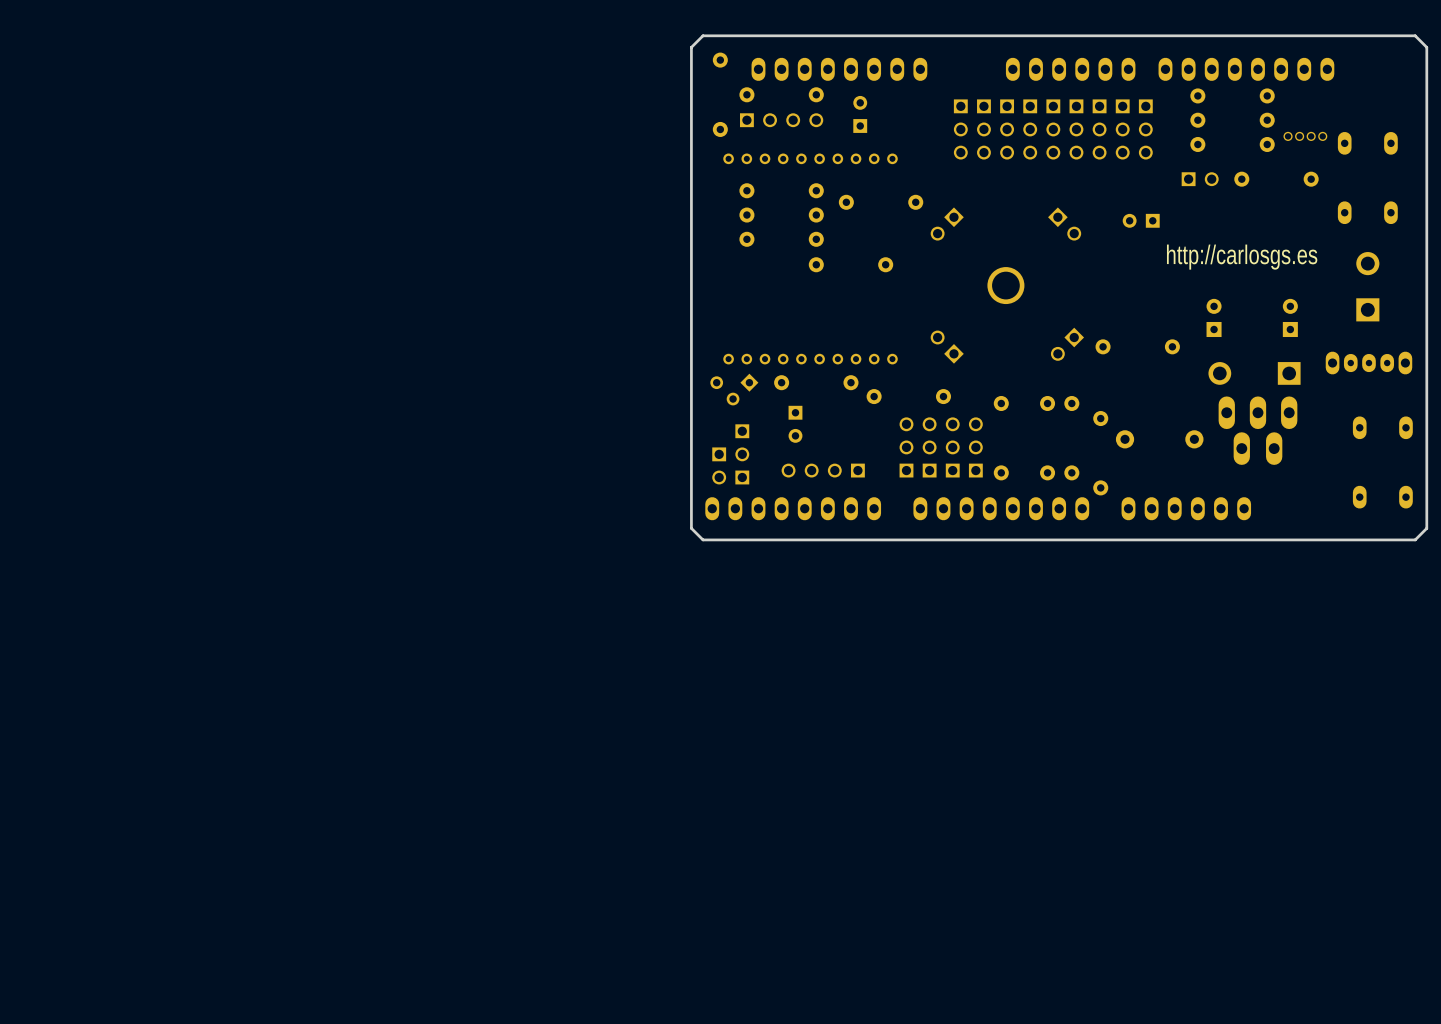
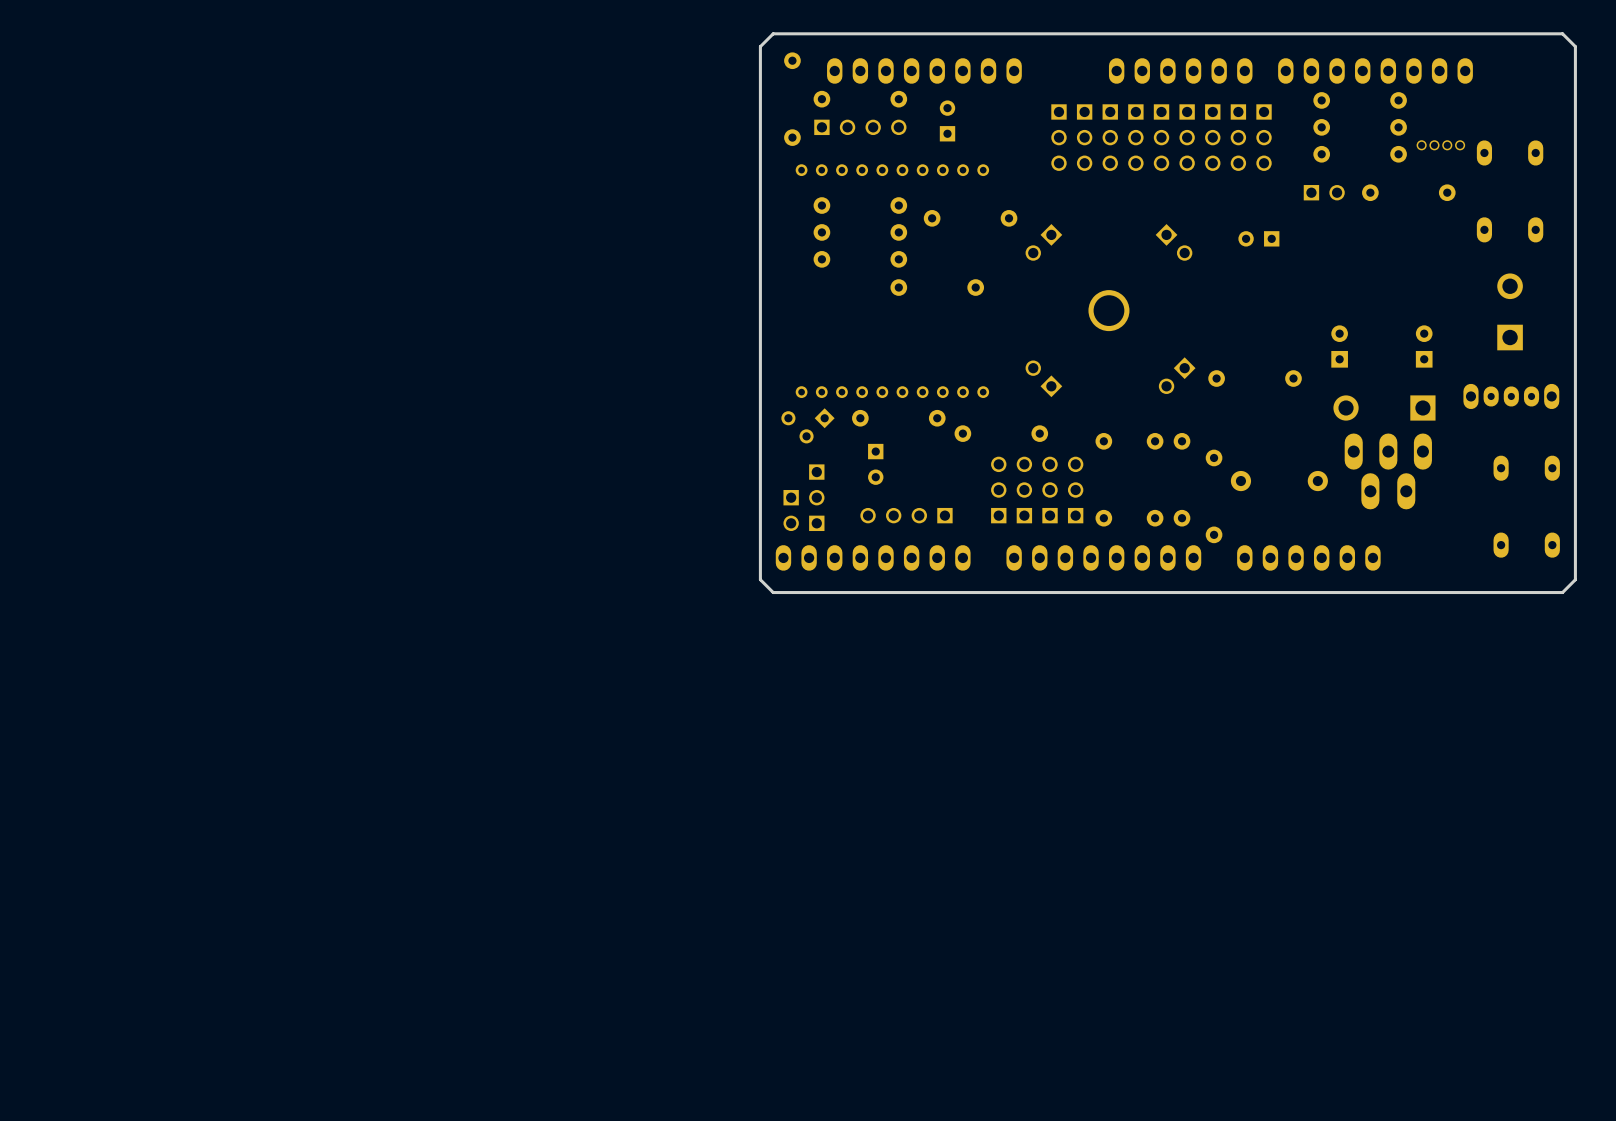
text: http://carlosgs.es (1242, 257) -> none

